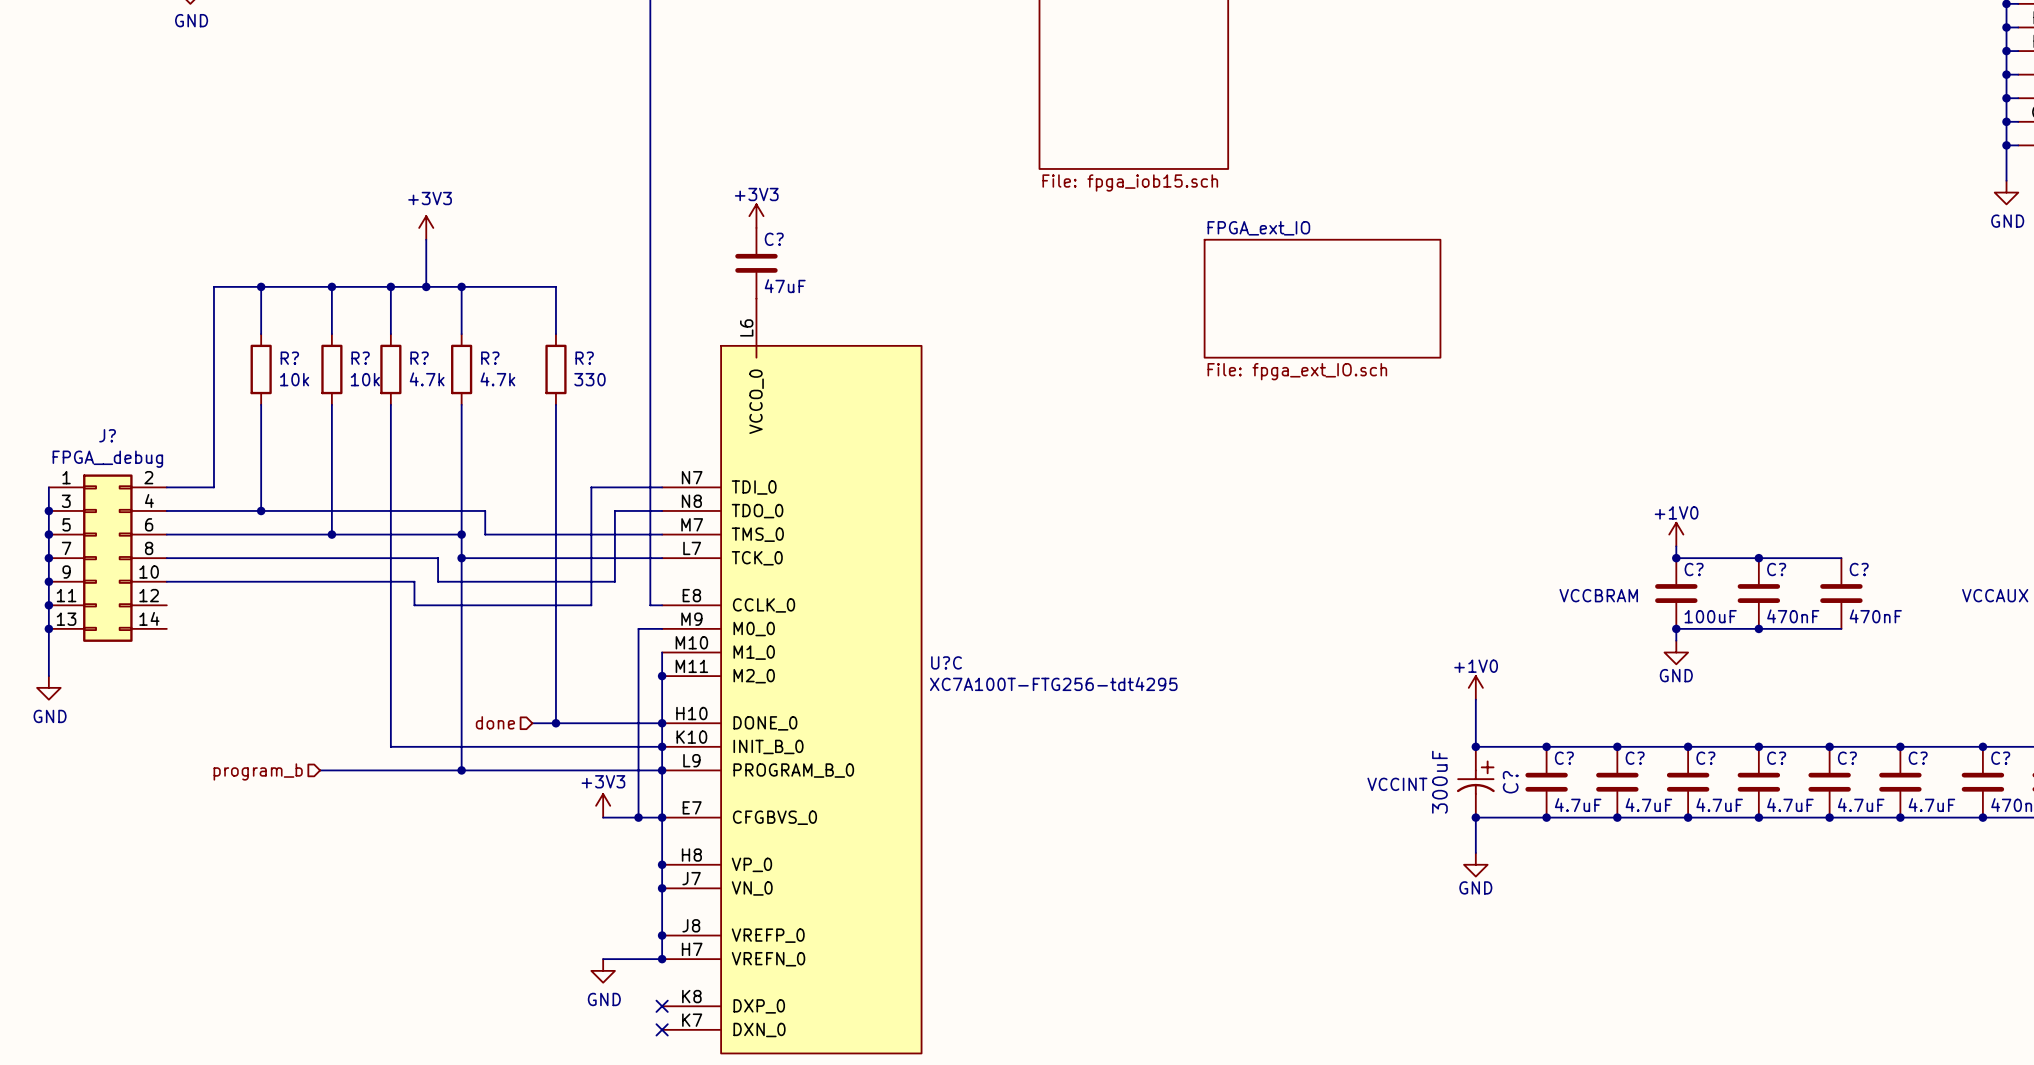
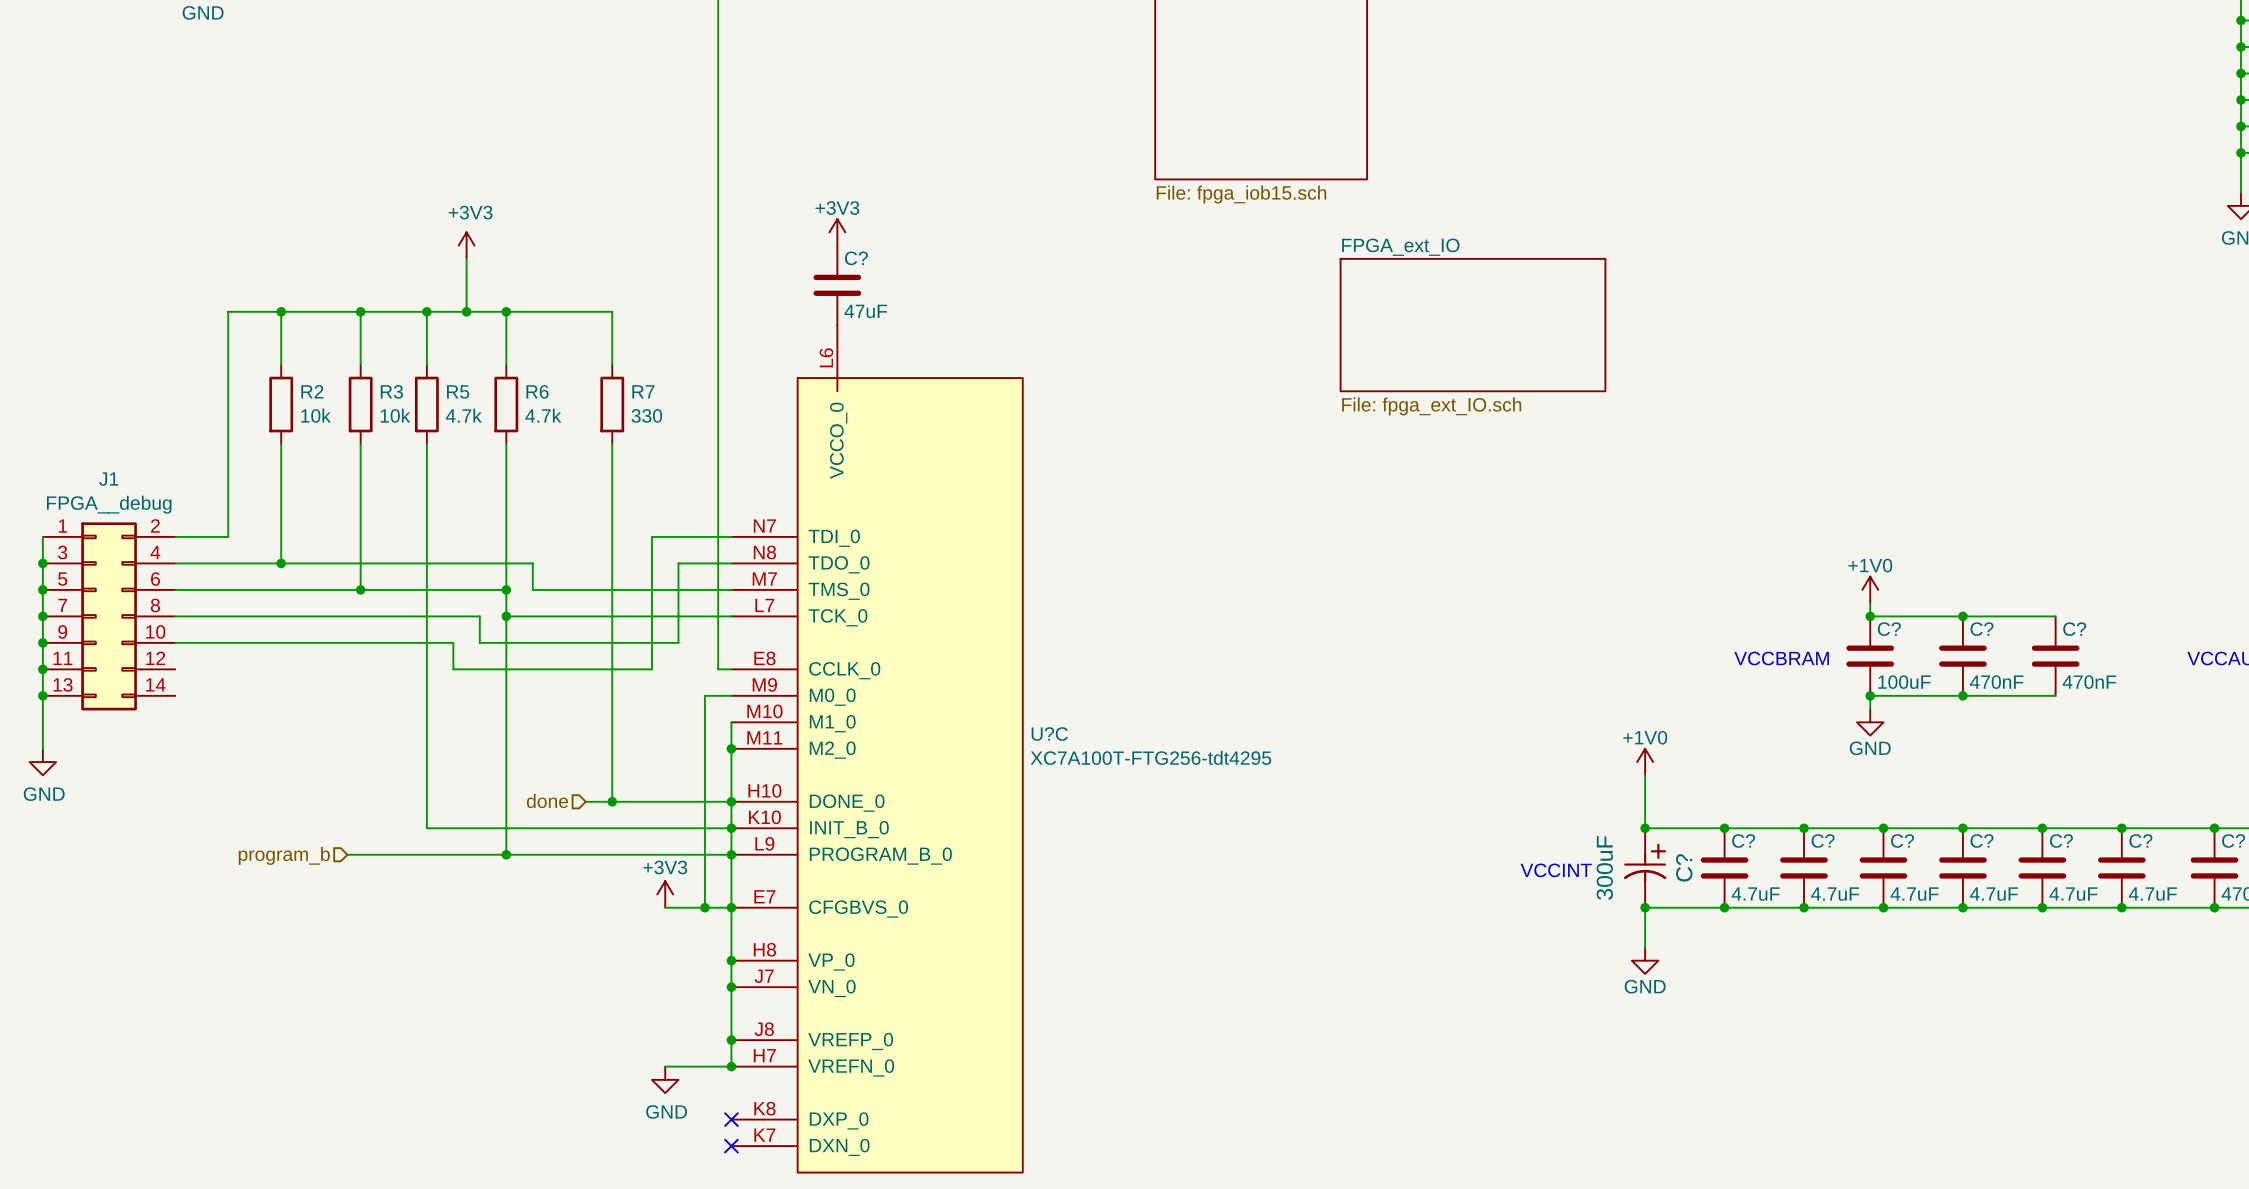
R? name: R? (289, 358) -> R2 (312, 391)
R? name: R? (360, 358) -> R3 (391, 391)
R? name: R? (419, 358) -> R5 (458, 391)
R? name: R? (490, 358) -> R6 (537, 391)
R? name: R? (584, 358) -> R7 (643, 391)
J? name: J? (107, 435) -> J1 (108, 479)

